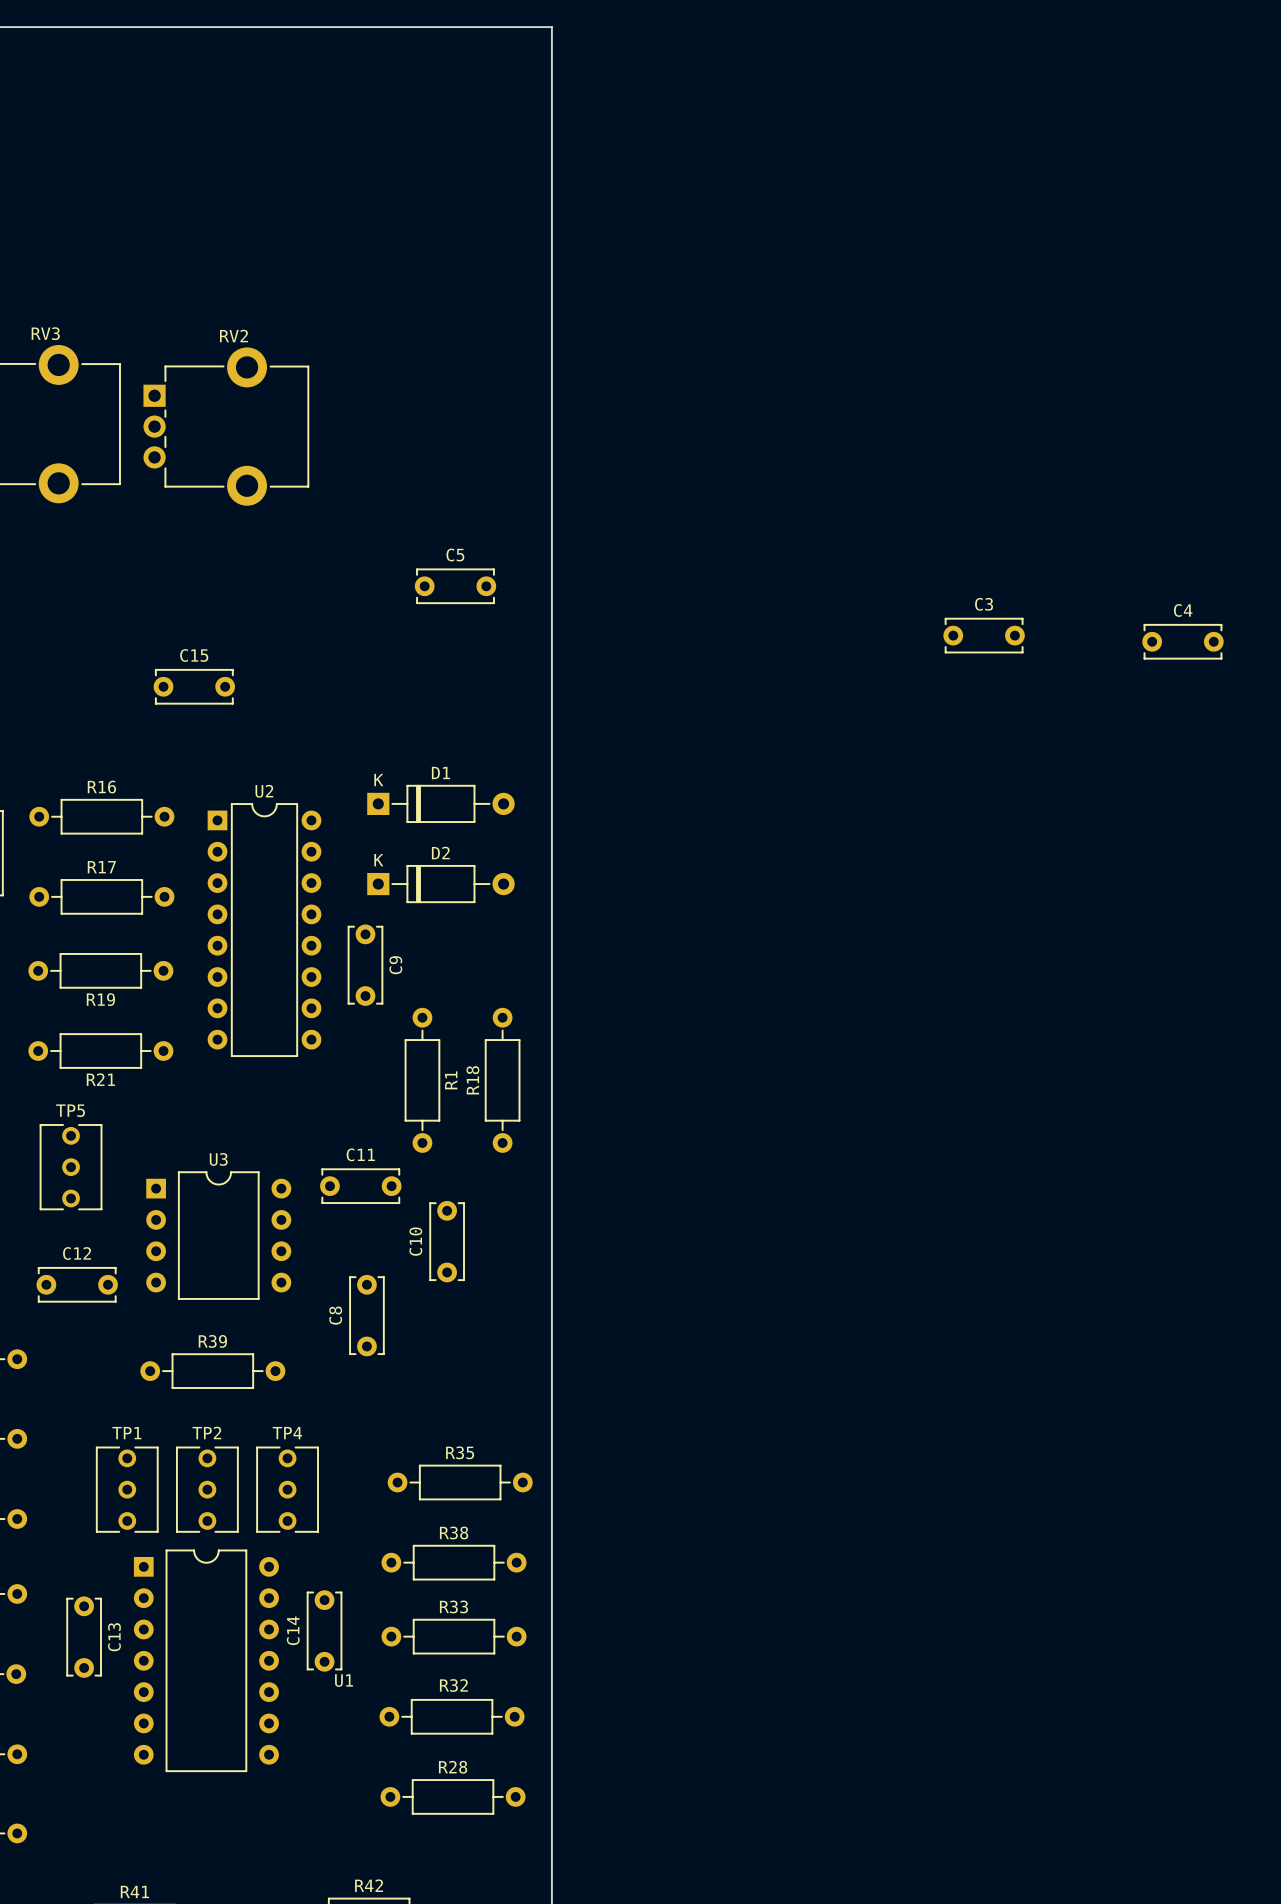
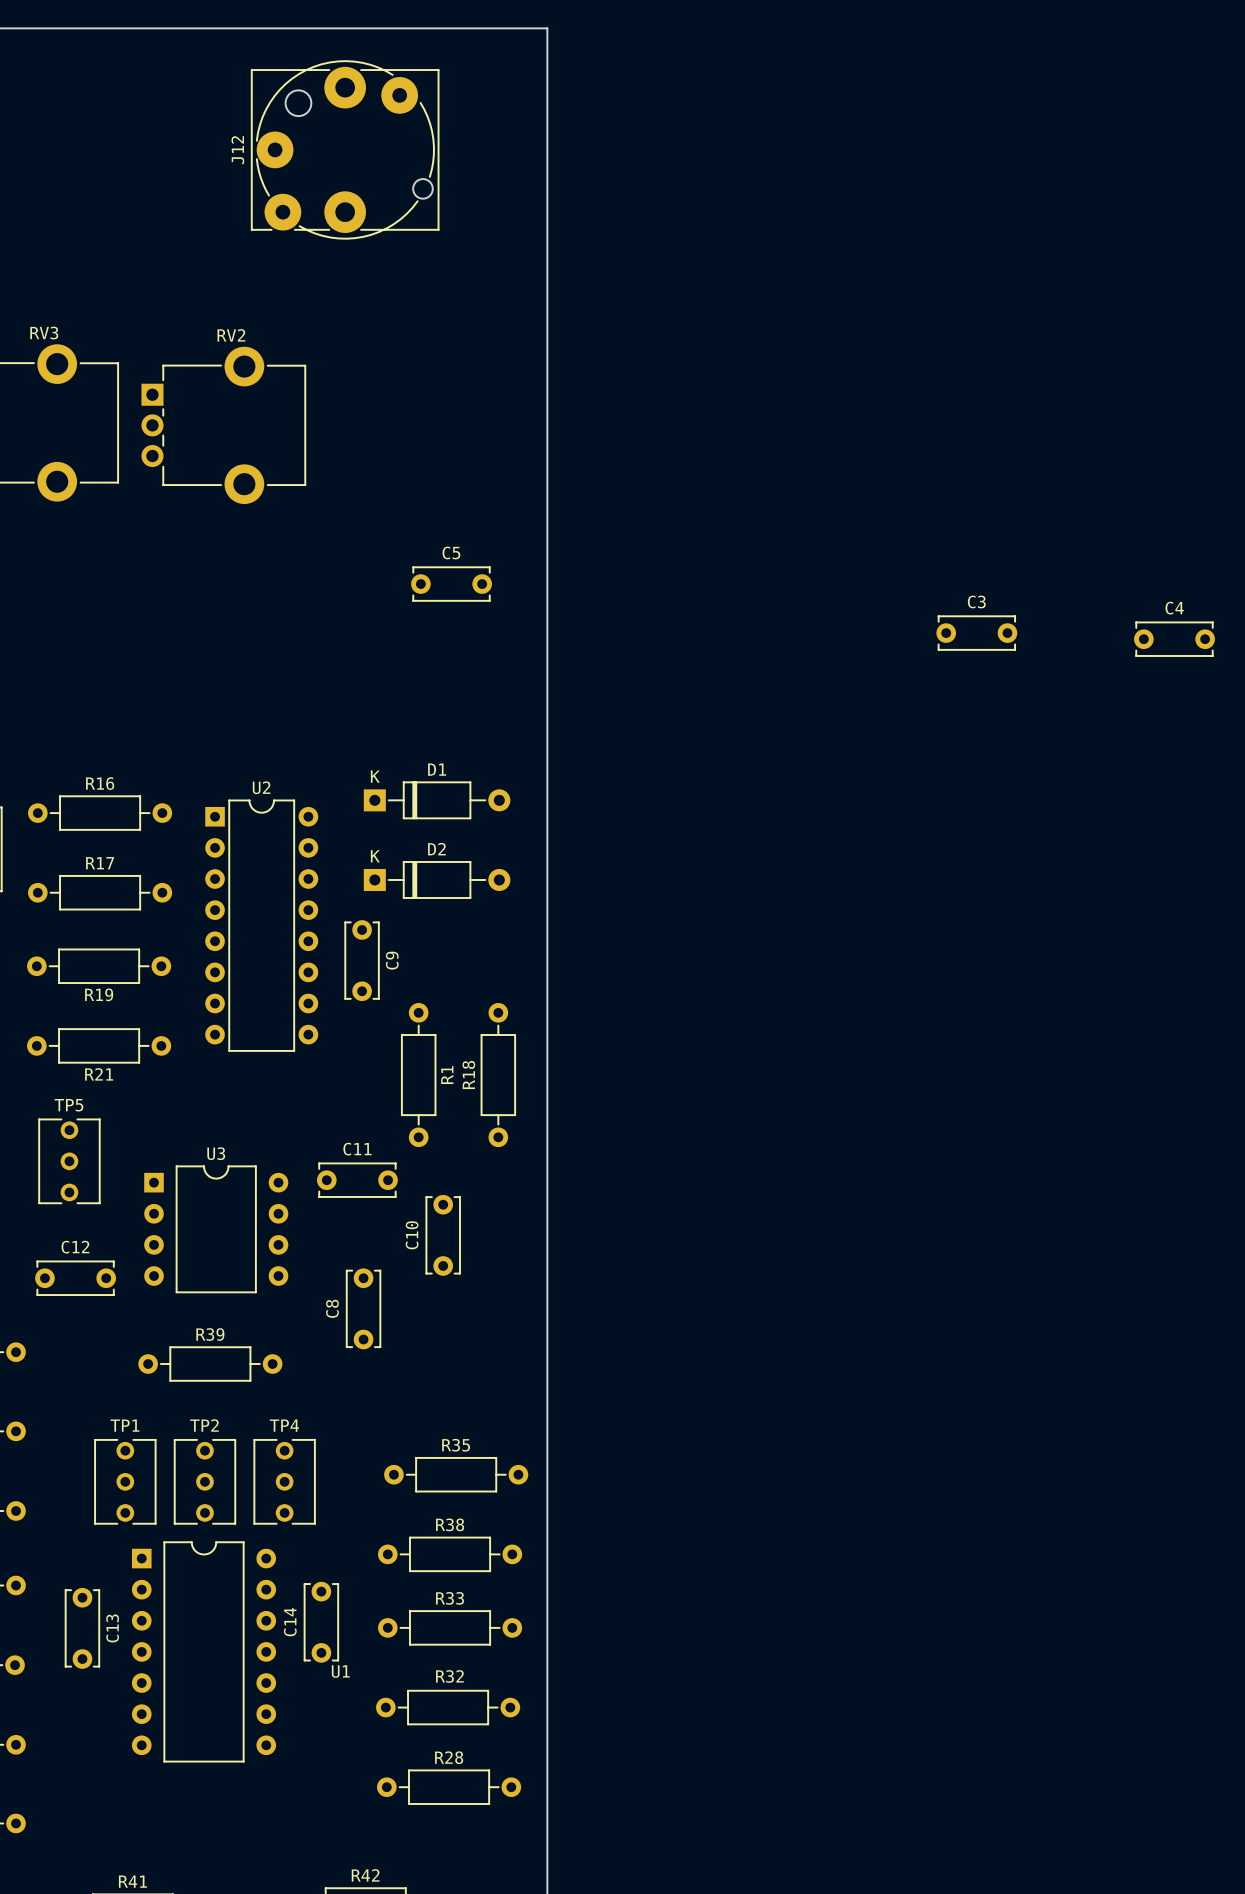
J12: none -> (345, 149)
C15: (194, 686) -> none

